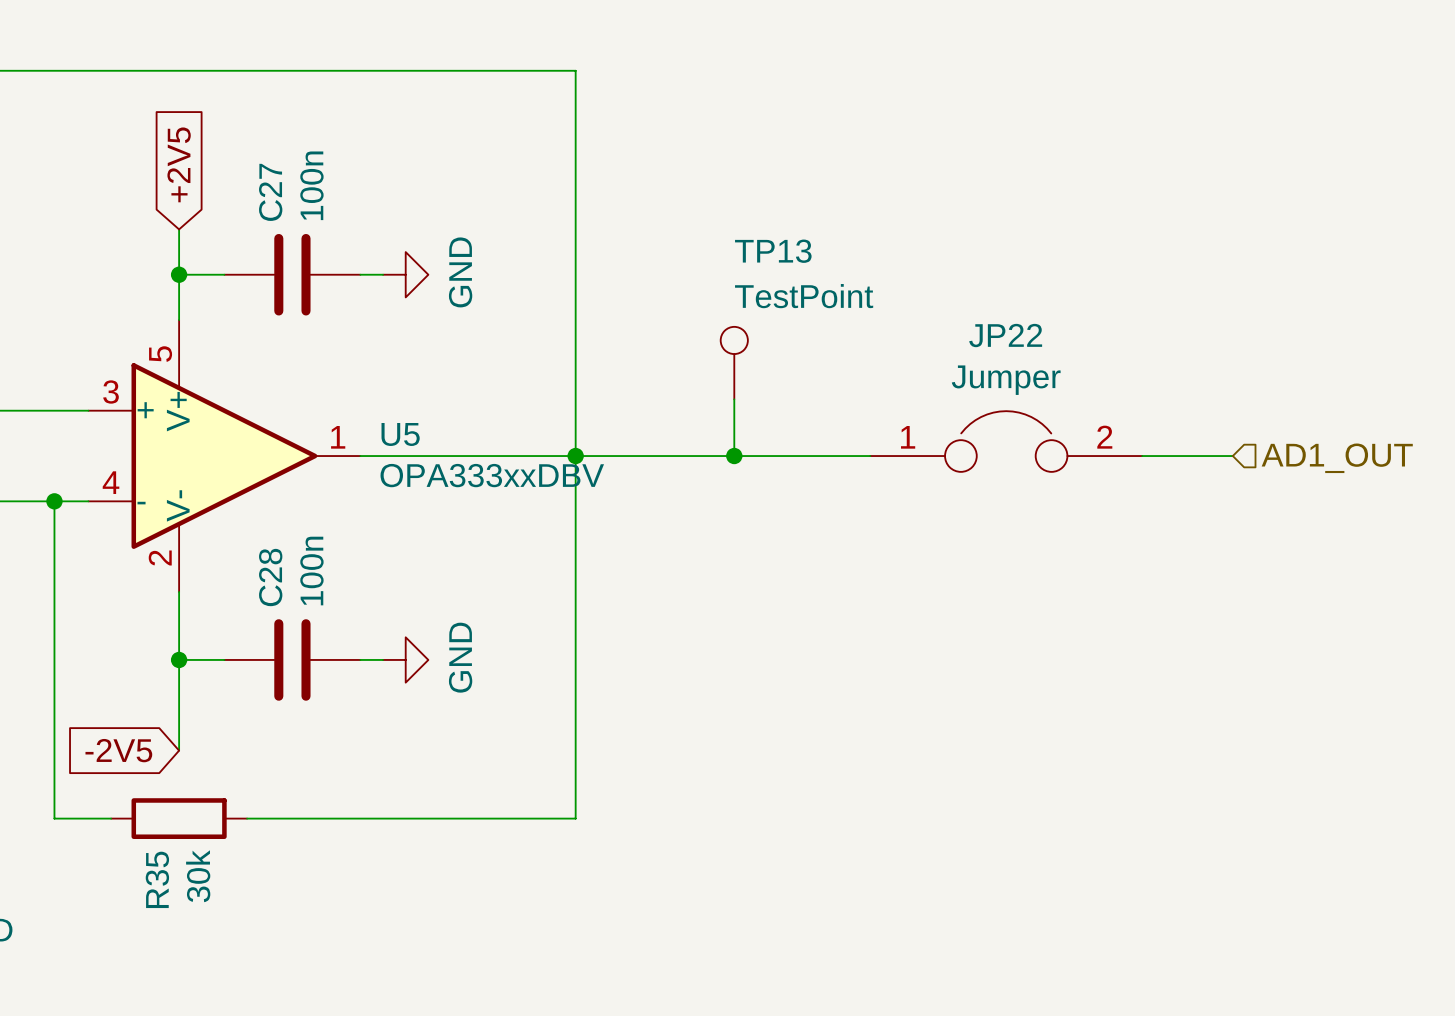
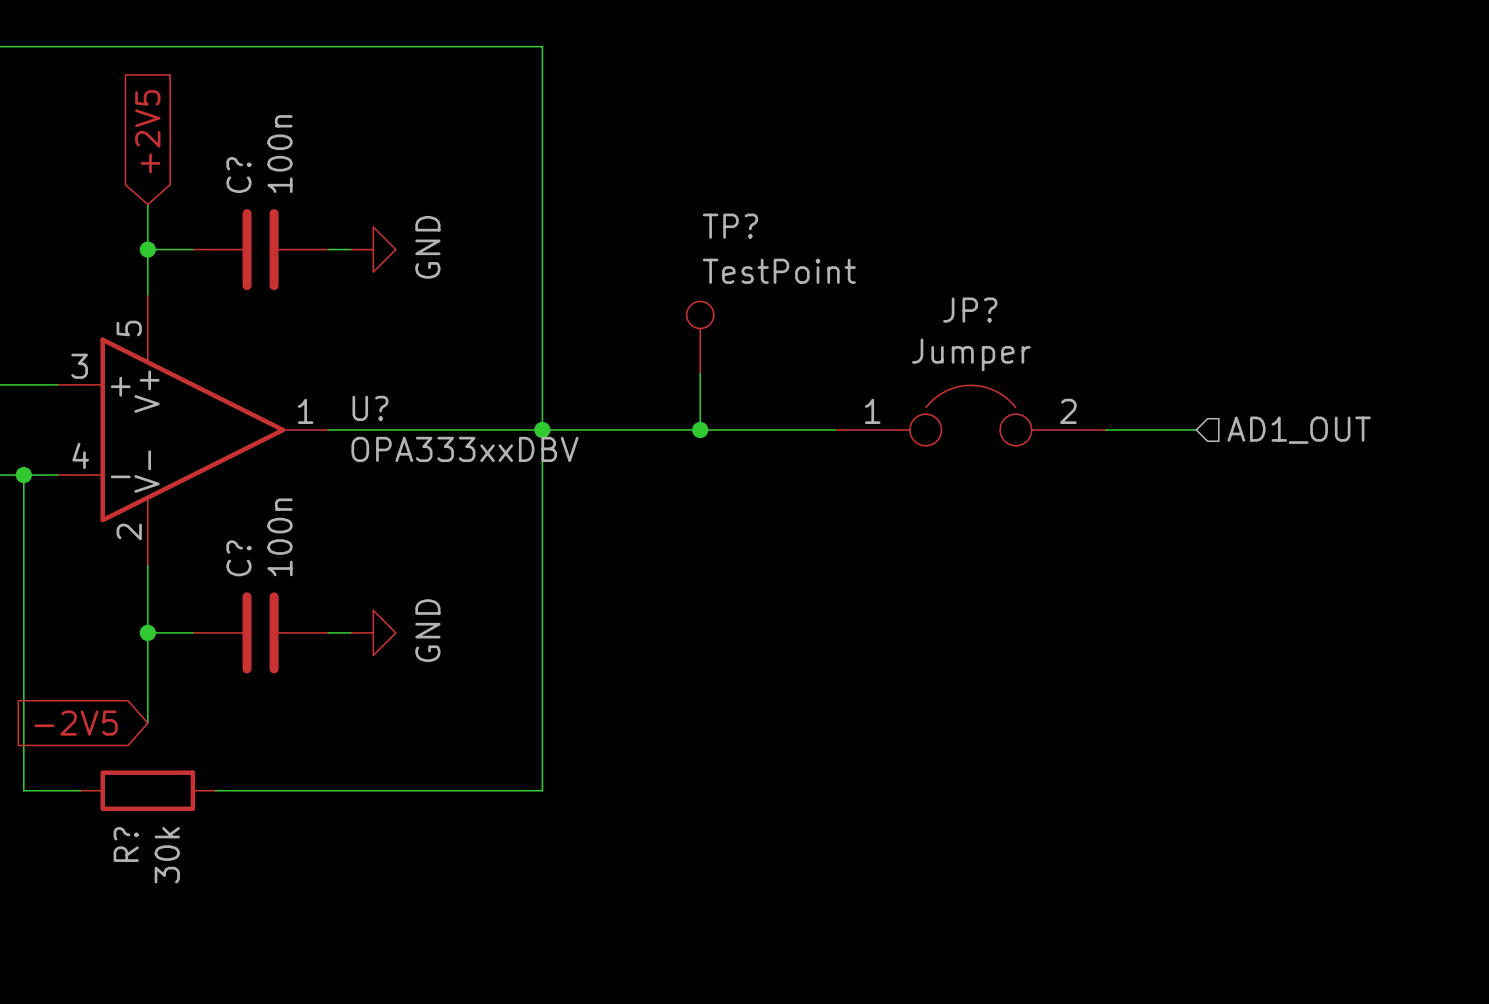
C27 name: C27 (270, 192) -> C? (238, 175)
TP13 name: TP13 (773, 251) -> TP? (730, 226)
JP22 name: JP22 (1005, 335) -> JP? (970, 310)
U5 name: U5 (400, 434) -> U? (370, 408)
C28 name: C28 (270, 577) -> C? (238, 558)
R35 name: R35 (157, 879) -> R? (126, 844)

